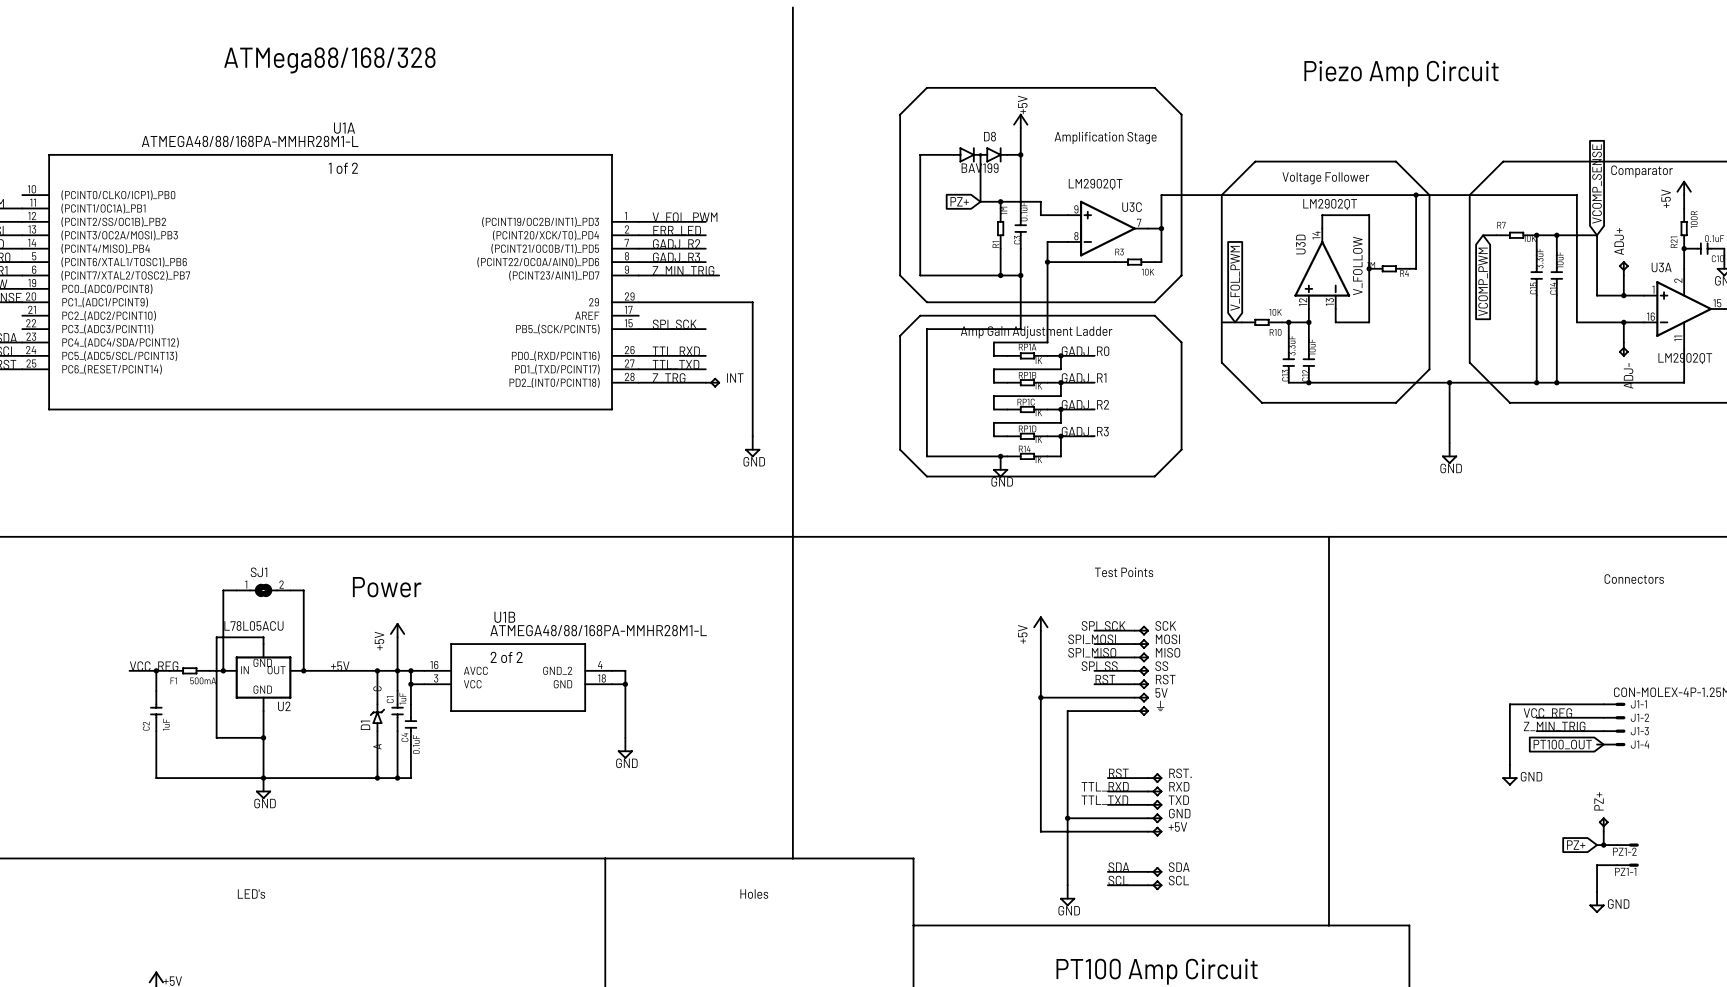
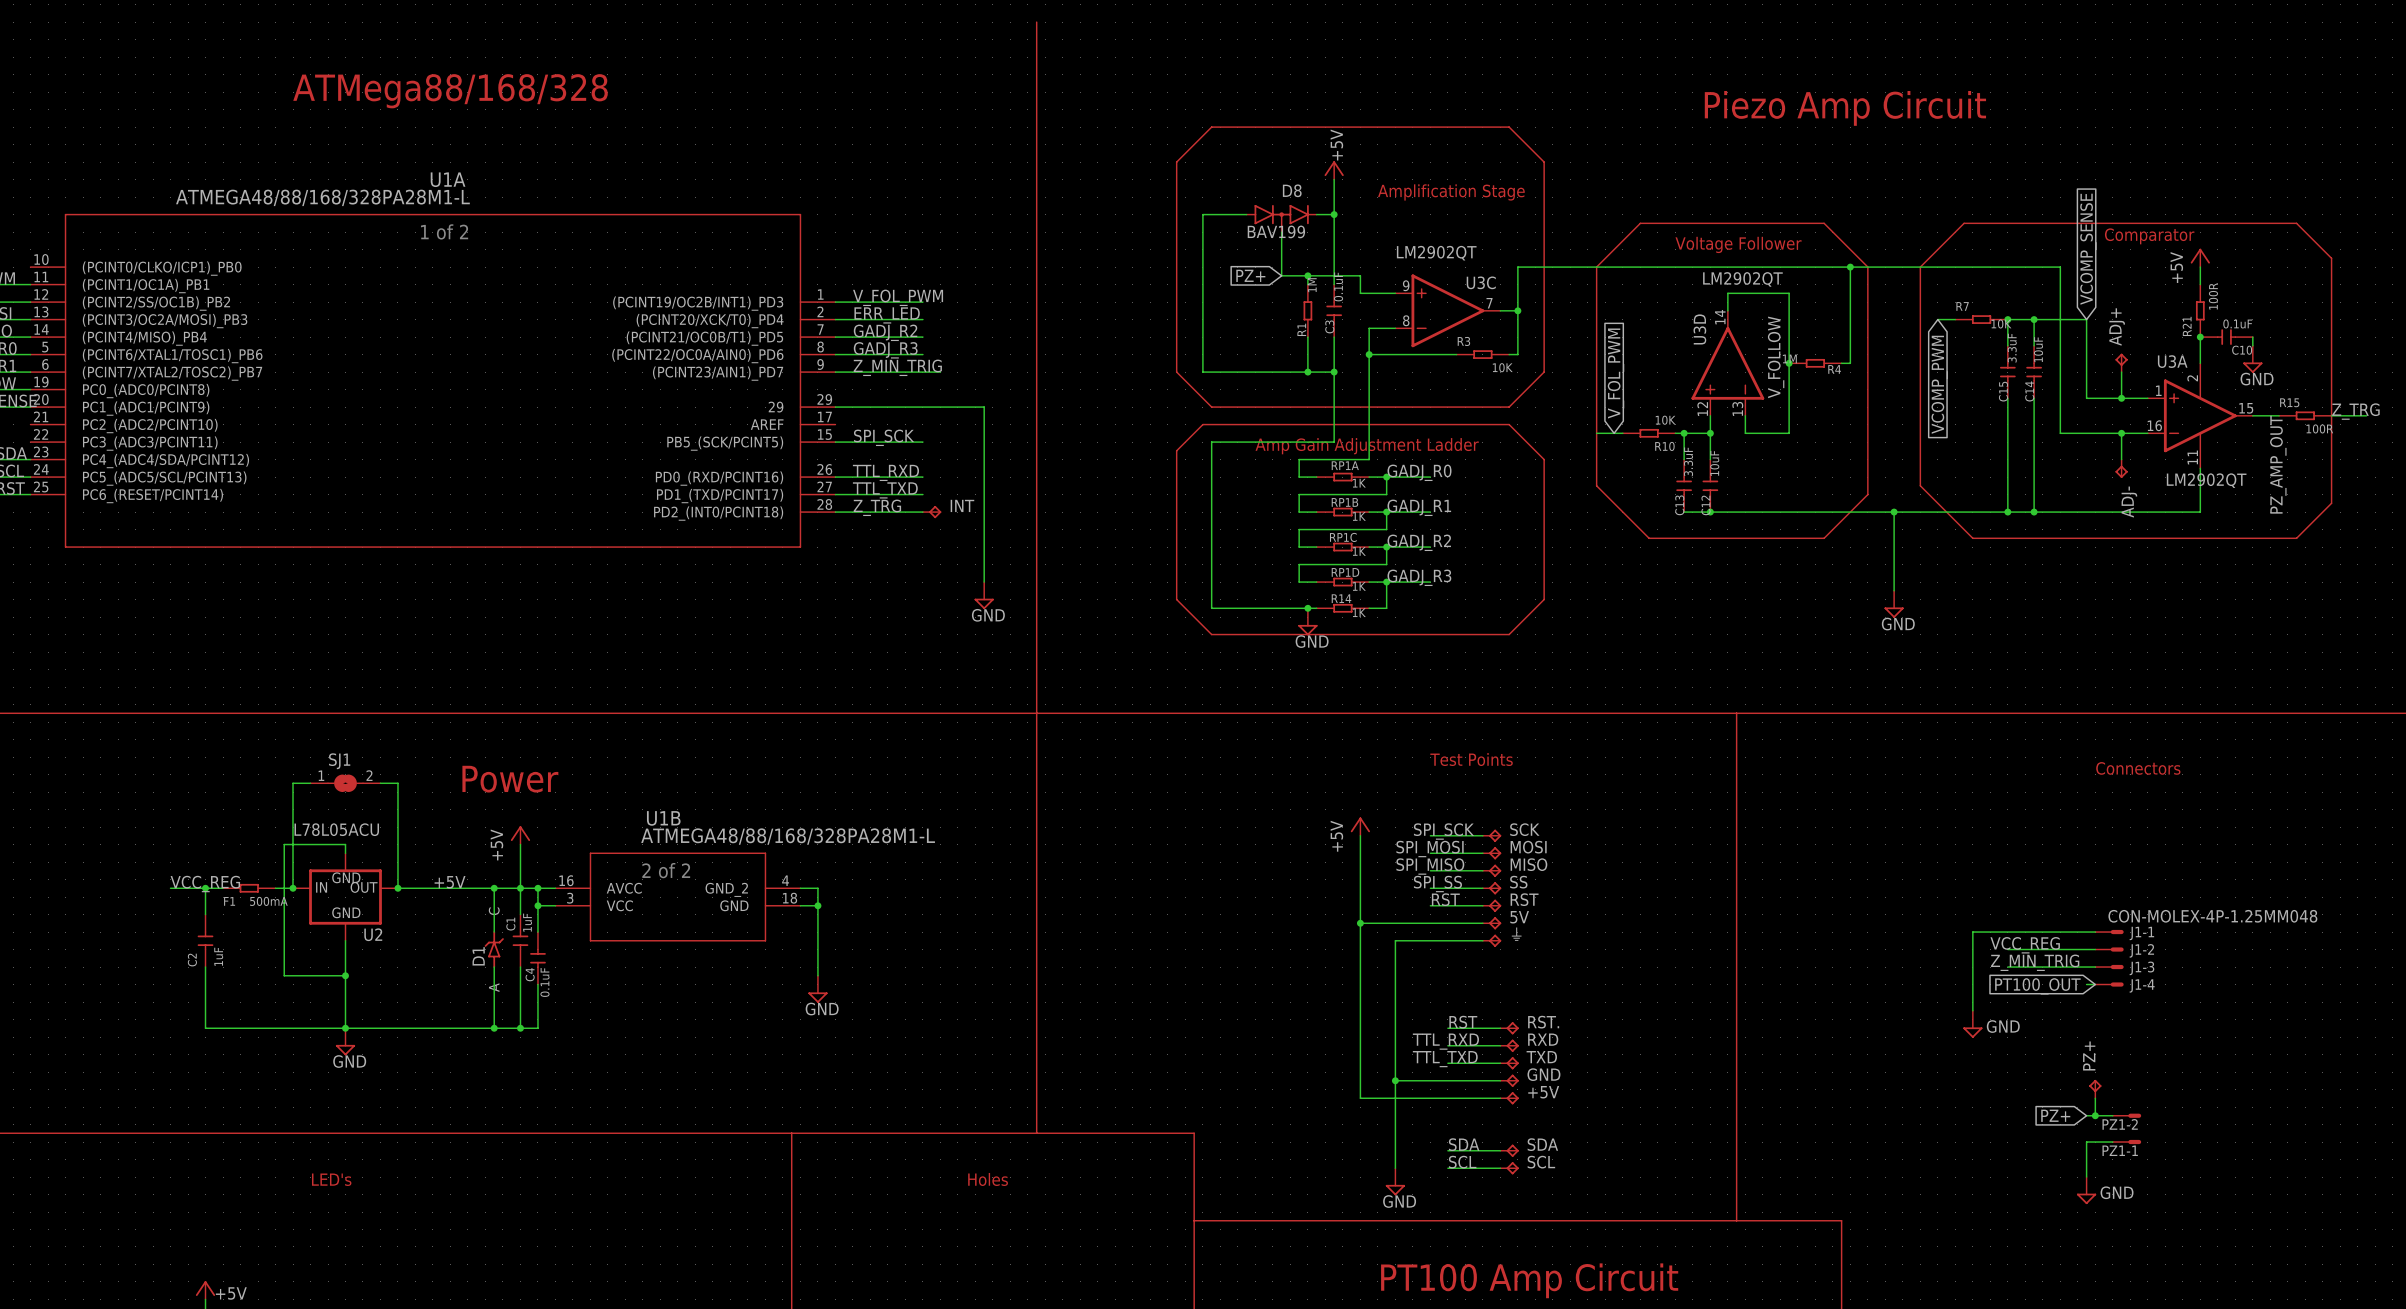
U1A value: ATMEGA48/88/168PA-MMHR28M1-L (250, 141) -> ATMEGA48/88/168/328PA28M1-L (322, 197)
U1B value: ATMEGA48/88/168PA-MMHR28M1-L (598, 630) -> ATMEGA48/88/168/328PA28M1-L (788, 836)

